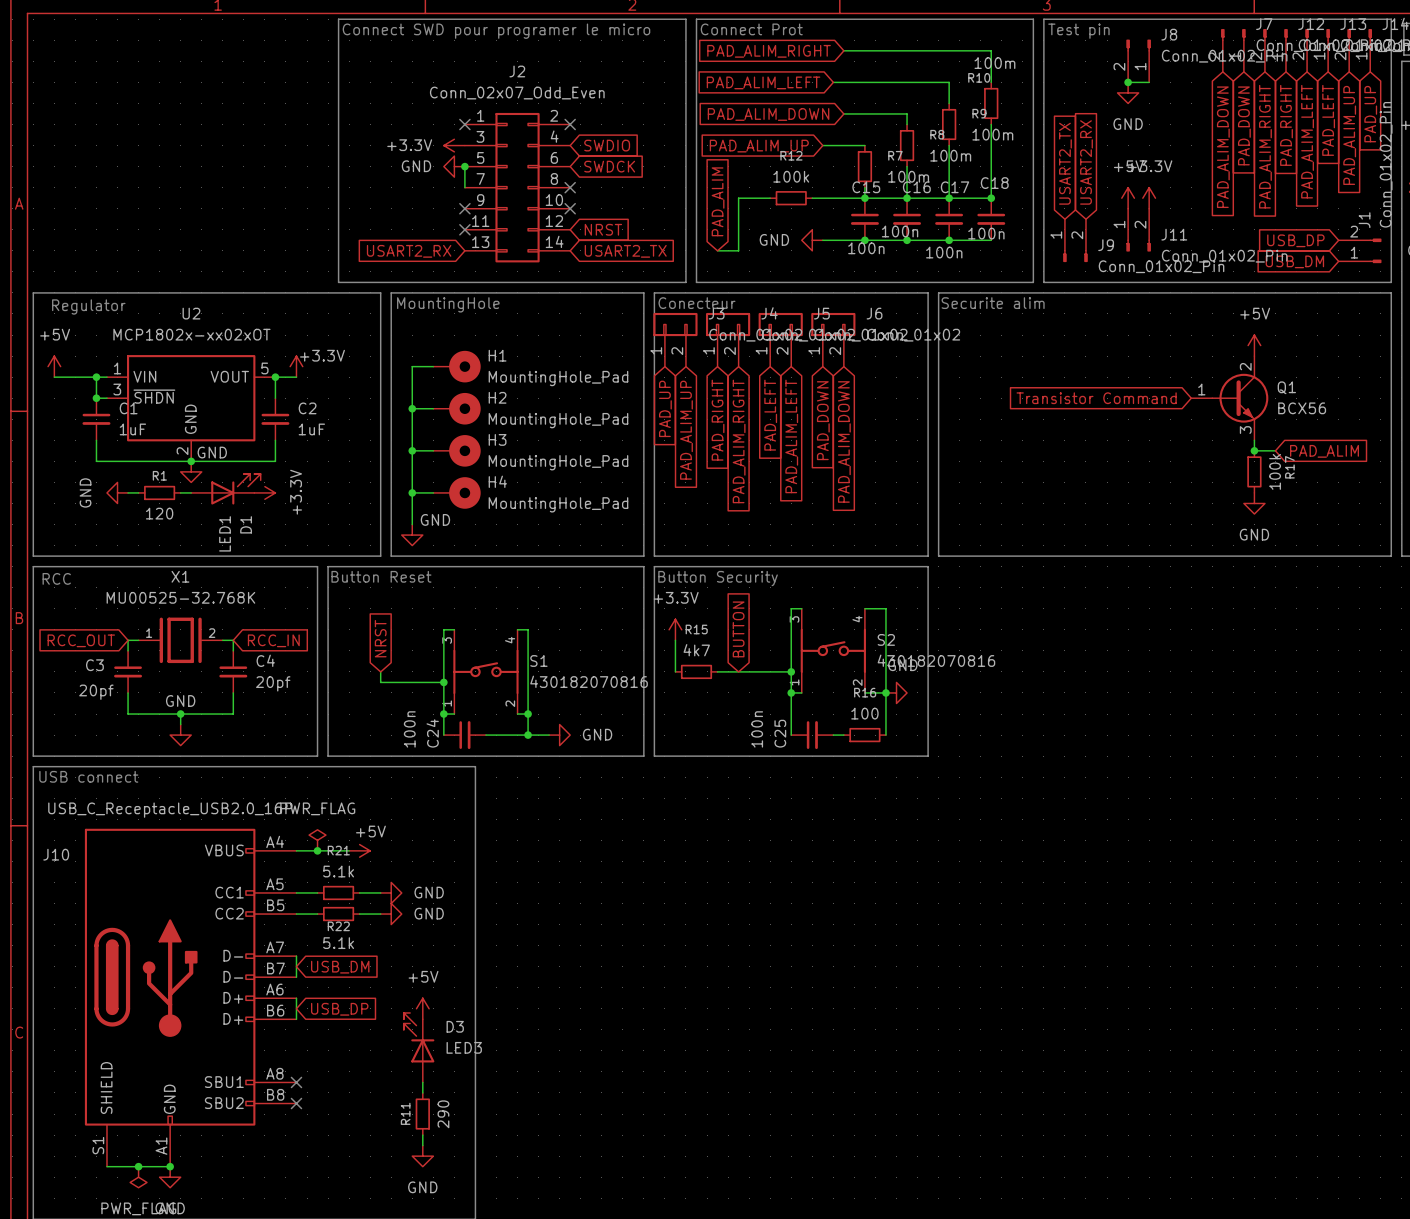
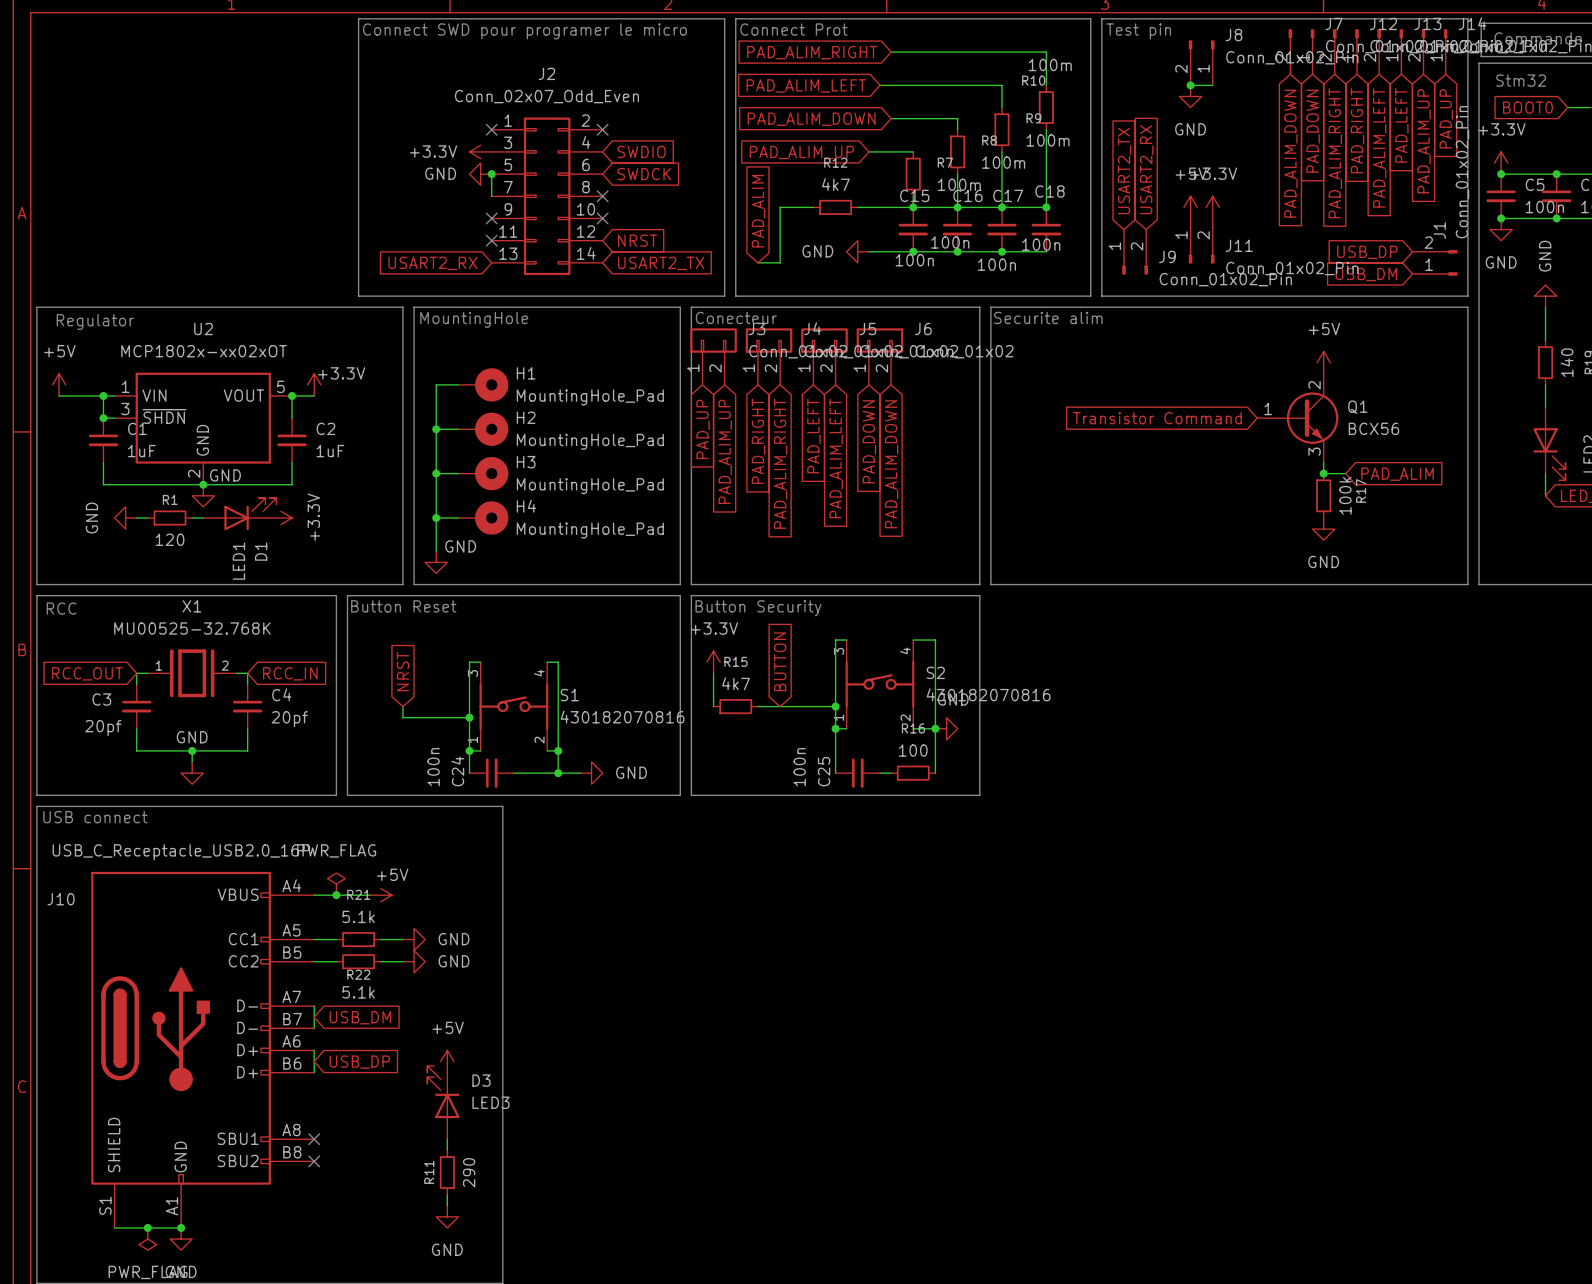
R12 value: 100k (791, 176) -> 4k7 (835, 184)

